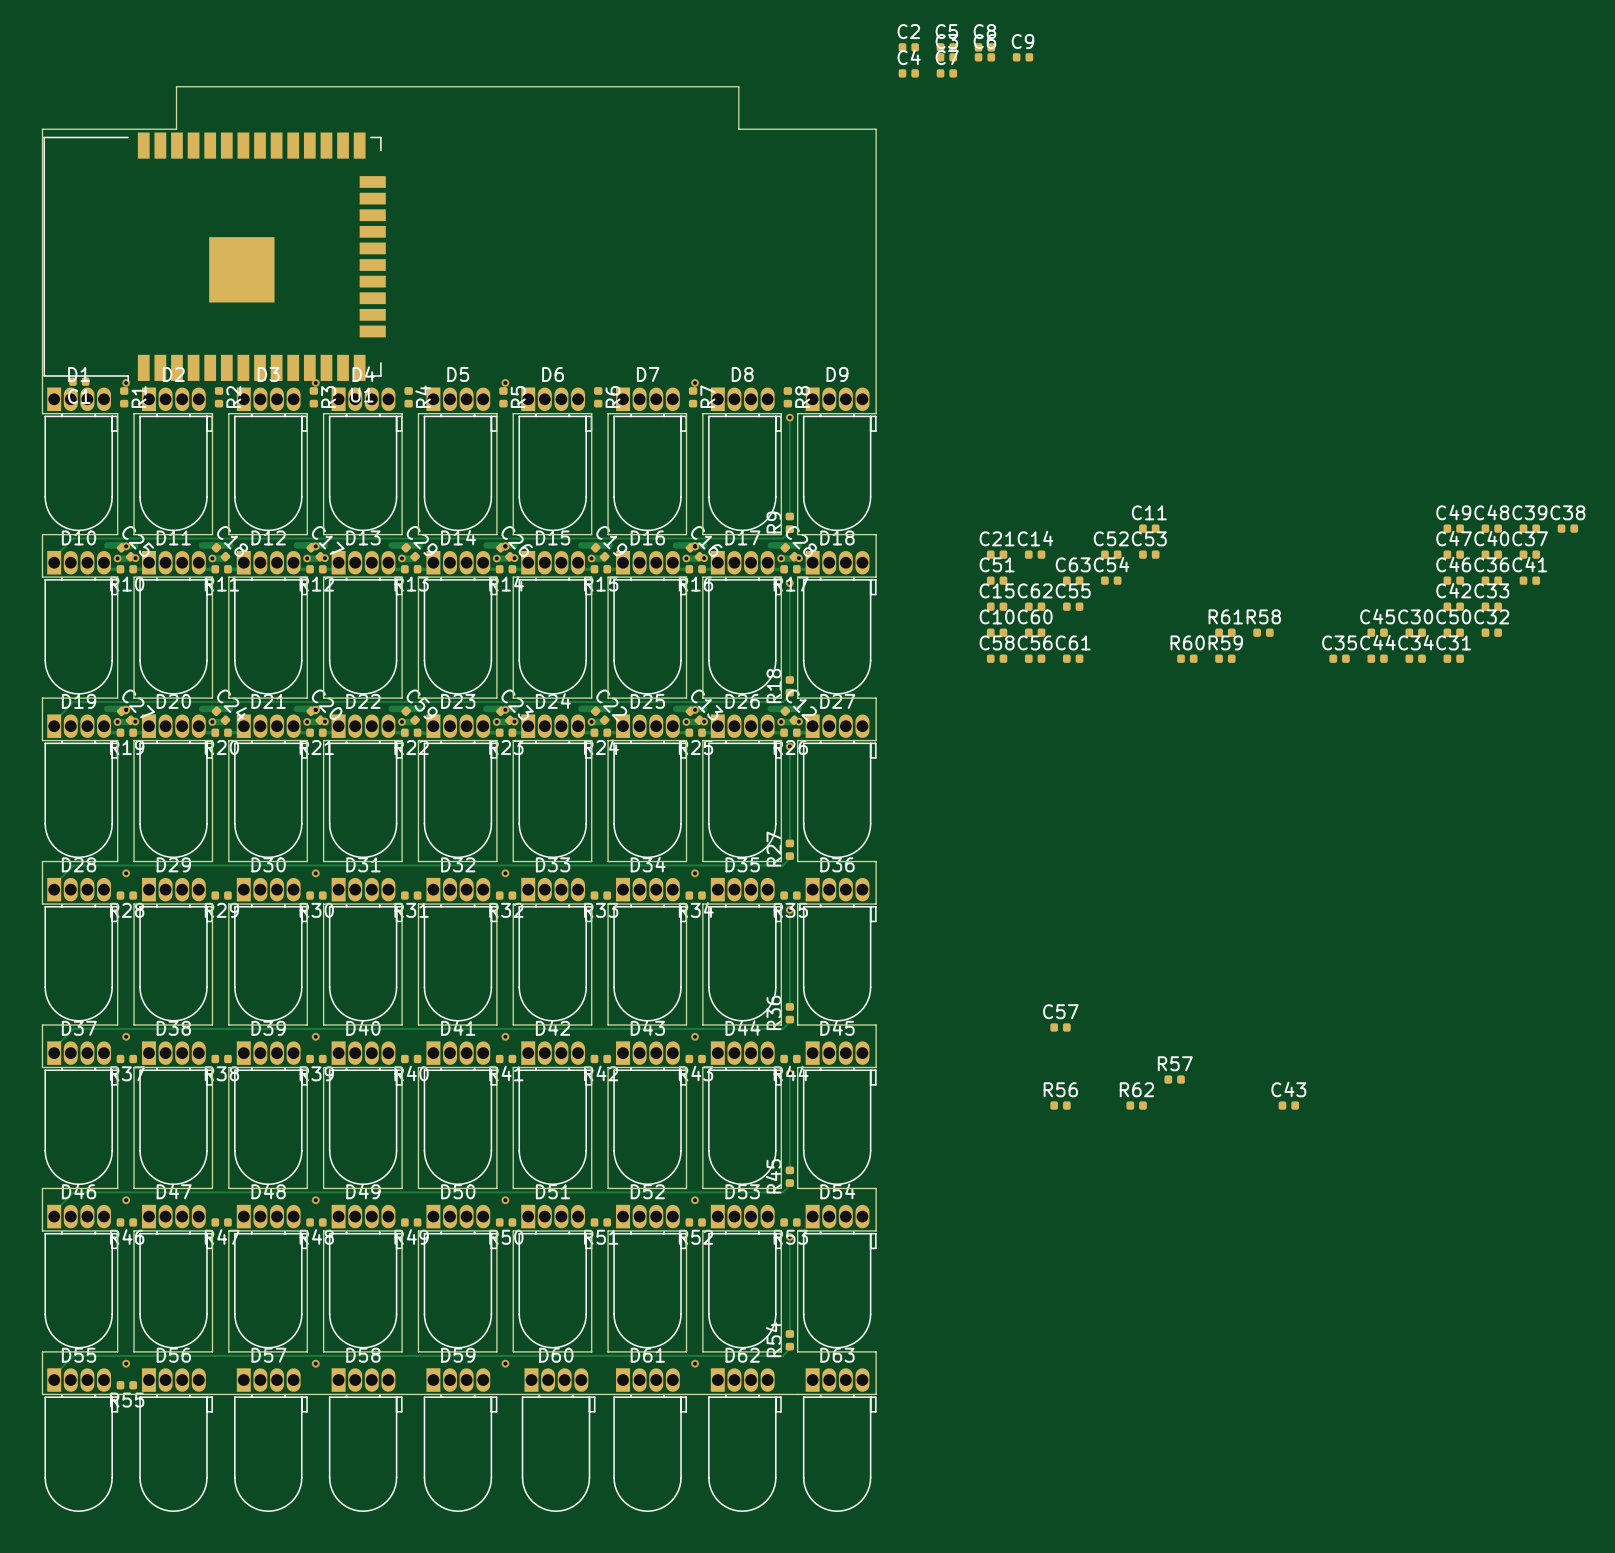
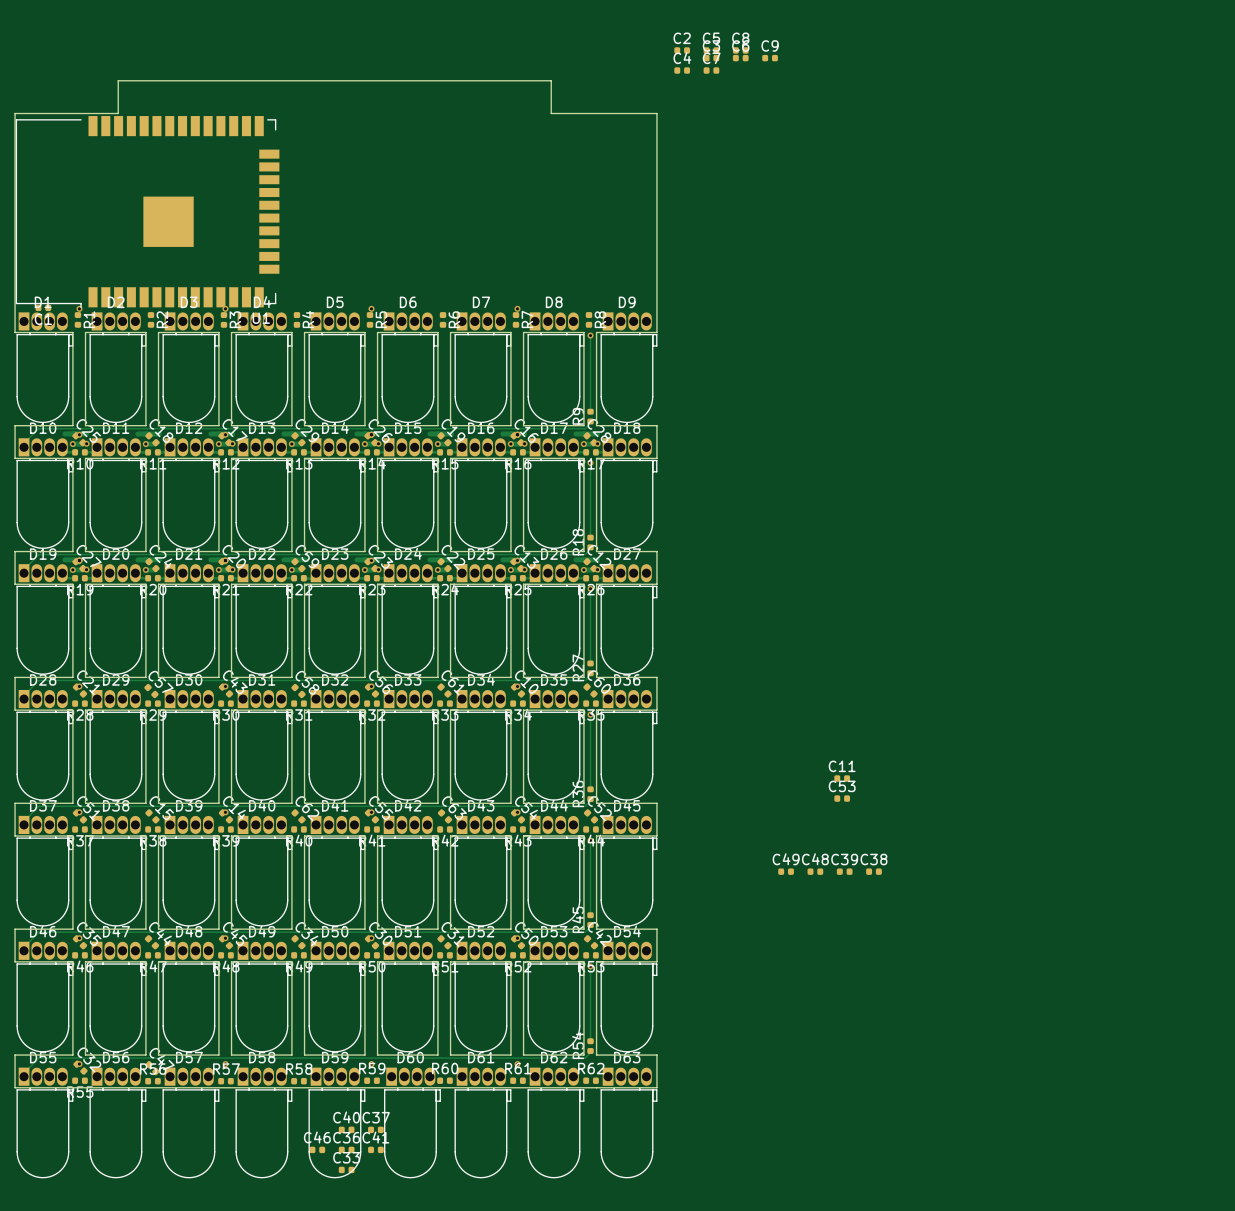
C11 position: (1149, 528) -> (842, 778)
C49 position: (1453, 528) -> (786, 871)
C48 position: (1491, 528) -> (815, 871)
C39 position: (1529, 528) -> (844, 871)
C38 position: (1567, 528) -> (873, 871)
C21 rotation: 0° (997, 554) -> 45° clockwise (79, 690)
C21 position: (997, 554) -> (79, 690)
C14 rotation: 0° (1035, 554) -> 45° clockwise (225, 816)
C14 position: (1035, 554) -> (225, 816)
C52 rotation: 0° (1111, 554) -> 45° clockwise (591, 816)
C52 position: (1111, 554) -> (591, 816)
C53 position: (1149, 554) -> (842, 798)
C47 rotation: 0° (1453, 554) -> 45° clockwise (152, 1068)
C47 position: (1453, 554) -> (152, 1068)
C40 position: (1491, 554) -> (346, 1129)
C37 position: (1529, 554) -> (375, 1129)
C51 rotation: 0° (997, 580) -> 45° clockwise (79, 816)
C51 position: (997, 580) -> (79, 816)
C63 rotation: 0° (1073, 580) -> 45° clockwise (445, 816)
C63 position: (1073, 580) -> (445, 816)
C54 rotation: 0° (1111, 580) -> 45° clockwise (518, 816)
C54 position: (1111, 580) -> (518, 816)
C46 position: (1453, 580) -> (317, 1149)
C36 position: (1491, 580) -> (346, 1149)
C41 position: (1529, 580) -> (375, 1149)
C15 rotation: 0° (997, 606) -> 45° clockwise (152, 816)
C15 position: (997, 606) -> (152, 816)
C62 rotation: 0° (1035, 606) -> 45° clockwise (298, 816)
C62 position: (1035, 606) -> (298, 816)
C55 rotation: 0° (1073, 606) -> 45° clockwise (371, 816)
C55 position: (1073, 606) -> (371, 816)
C42 rotation: 0° (1453, 606) -> 45° clockwise (591, 942)
C42 position: (1453, 606) -> (591, 942)
C33 position: (1491, 606) -> (346, 1169)
C10 rotation: 0° (997, 632) -> 45° clockwise (518, 690)
C10 position: (997, 632) -> (518, 690)
C60 rotation: 0° (1035, 632) -> 45° clockwise (590, 690)
C60 position: (1035, 632) -> (590, 690)
R61 position: (1225, 632) -> (518, 1080)
R58 position: (1263, 632) -> (299, 1081)
C45 rotation: 0° (1377, 632) -> 45° clockwise (225, 942)
C45 position: (1377, 632) -> (225, 942)
C30 rotation: 0° (1415, 632) -> 45° clockwise (372, 942)
C30 position: (1415, 632) -> (372, 942)
C50 rotation: 0° (1453, 632) -> 45° clockwise (518, 942)
C50 position: (1453, 632) -> (518, 942)
C32 rotation: 0° (1491, 632) -> 45° clockwise (80, 1067)
C32 position: (1491, 632) -> (80, 1067)
C58 rotation: 0° (997, 658) -> 45° clockwise (298, 691)
C58 position: (997, 658) -> (298, 691)
C56 rotation: 0° (1035, 658) -> 45° clockwise (372, 690)
C56 position: (1035, 658) -> (372, 690)
C61 rotation: 0° (1073, 658) -> 45° clockwise (444, 690)
C61 position: (1073, 658) -> (444, 690)
R60 position: (1187, 658) -> (445, 1080)
R59 position: (1225, 658) -> (372, 1080)
C35 rotation: 0° (1339, 658) -> 45° clockwise (79, 942)
C35 position: (1339, 658) -> (79, 942)
C44 rotation: 0° (1377, 658) -> 45° clockwise (151, 942)
C44 position: (1377, 658) -> (151, 942)
C34 rotation: 0° (1415, 658) -> 45° clockwise (298, 942)
C34 position: (1415, 658) -> (298, 942)
C31 rotation: 0° (1453, 658) -> 45° clockwise (444, 942)
C31 position: (1453, 658) -> (444, 942)
C57 rotation: 0° (1060, 1027) -> 45° clockwise (151, 691)
C57 position: (1060, 1027) -> (151, 691)
R57 position: (1174, 1079) -> (225, 1081)
R56 position: (1060, 1105) -> (152, 1081)
R62 position: (1136, 1105) -> (591, 1080)
C43 rotation: 0° (1288, 1105) -> 45° clockwise (225, 690)
C43 position: (1288, 1105) -> (225, 690)

